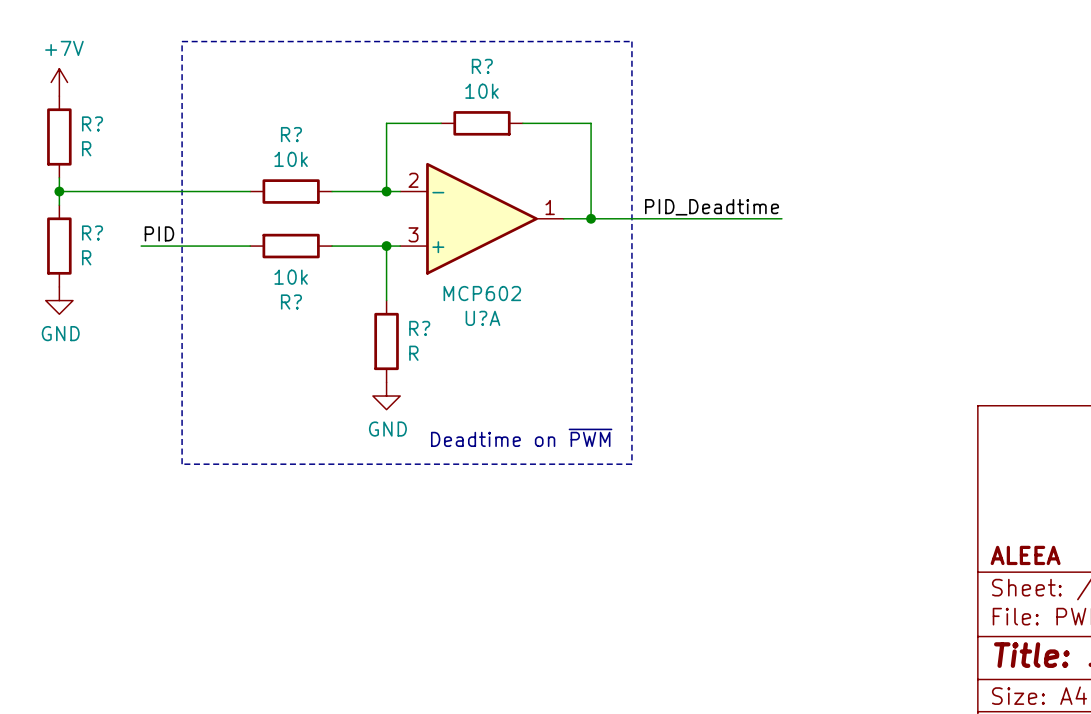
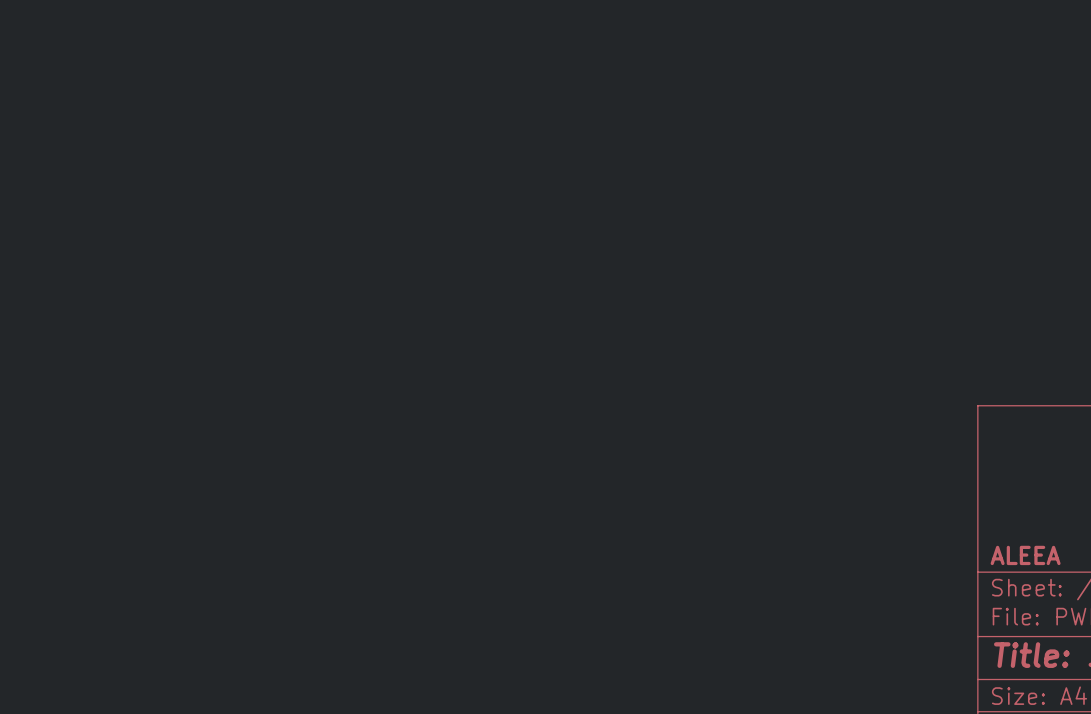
line: (182, 41) (182, 464) (631, 464) (631, 41) (182, 41) -> none
power symbol: +7V (59, 82) -> none
wire: (441, 123) (386, 123) (386, 191) -> none
R?: 10k (482, 123) -> none
wire: (522, 123) (591, 123) (591, 218) -> none
R?: R (59, 136) -> none
wire: (59, 177) (59, 205) -> none
wire: (59, 191) (250, 191) -> none
junction: (59, 191) -> none
R?: 10k (291, 191) -> none
wire: (332, 191) (400, 191) -> none
junction: (386, 191) -> none
label: PID_Deadtime (712, 207) -> none
U?A: MCP602 (482, 218) -> none
wire: (563, 218) (781, 218) -> none
junction: (591, 218) -> none
label: PID (159, 233) -> none
R?: R (59, 246) -> none
wire: (141, 246) (250, 246) -> none
R?: 10k (291, 246) -> none
wire: (332, 246) (400, 246) -> none
wire: (386, 246) (386, 300) -> none
junction: (386, 246) -> none
power symbol: GND (59, 300) -> none
R?: R (386, 341) -> none
power symbol: GND (386, 396) -> none
text: Deadtime on ~{PWM} (521, 437) -> none

